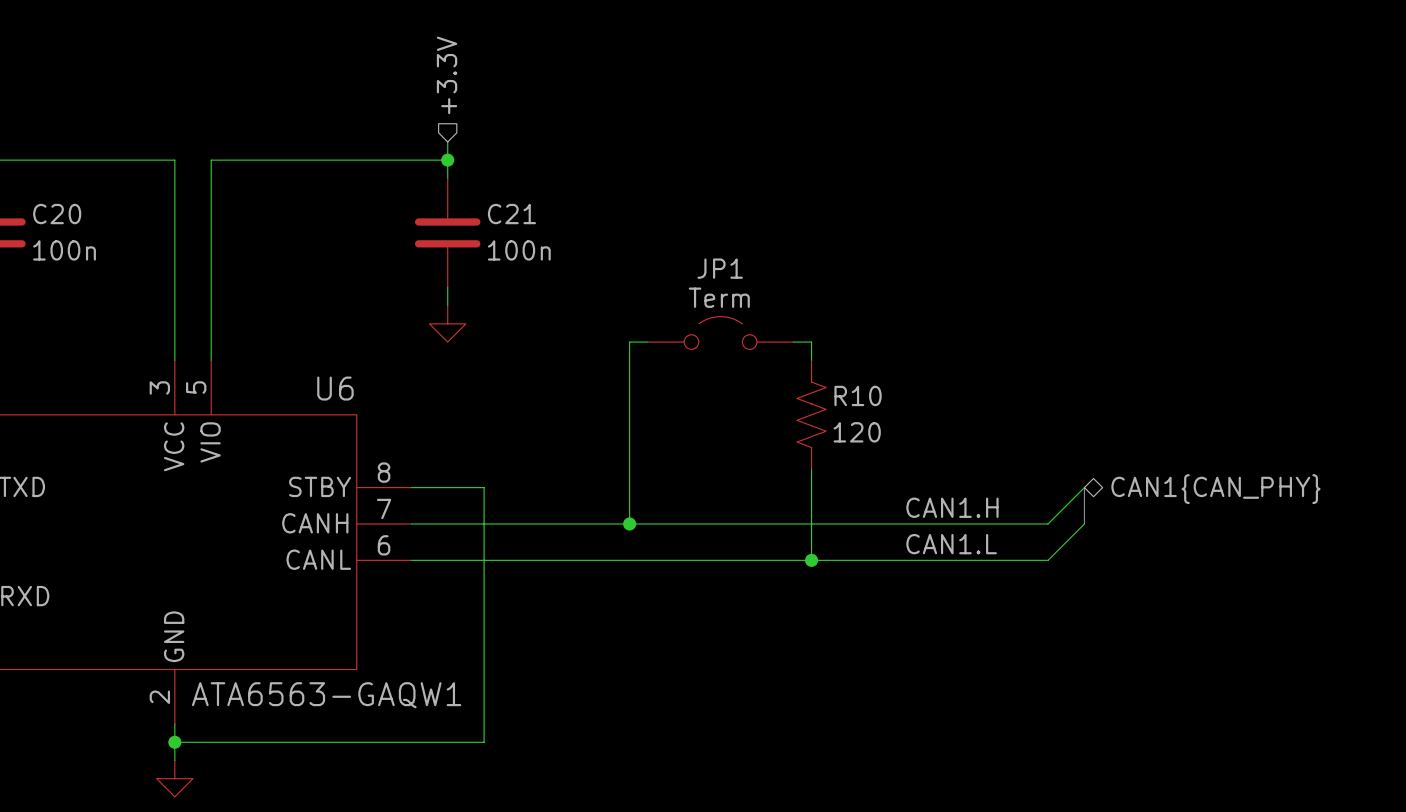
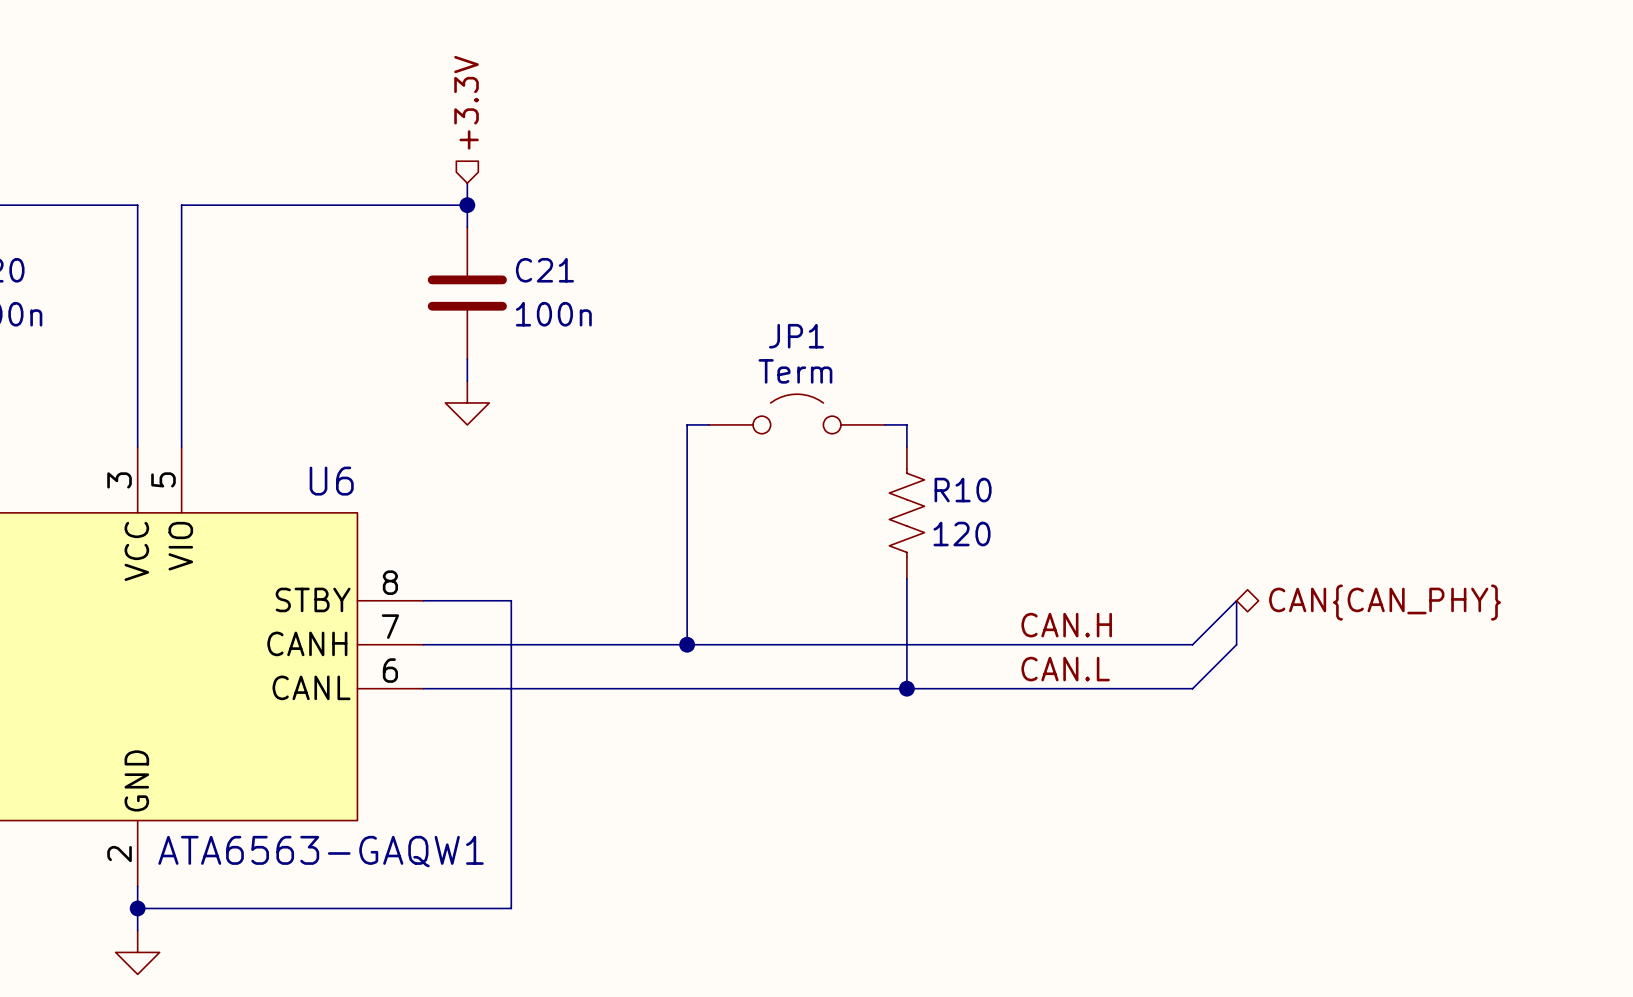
hierarchical label: CAN1{CAN_PHY} (1215, 489) -> CAN{CAN_PHY} (1385, 602)
label: CAN1.H (952, 507) -> CAN.H (1066, 625)
label: CAN1.L (951, 544) -> CAN.L (1065, 669)

